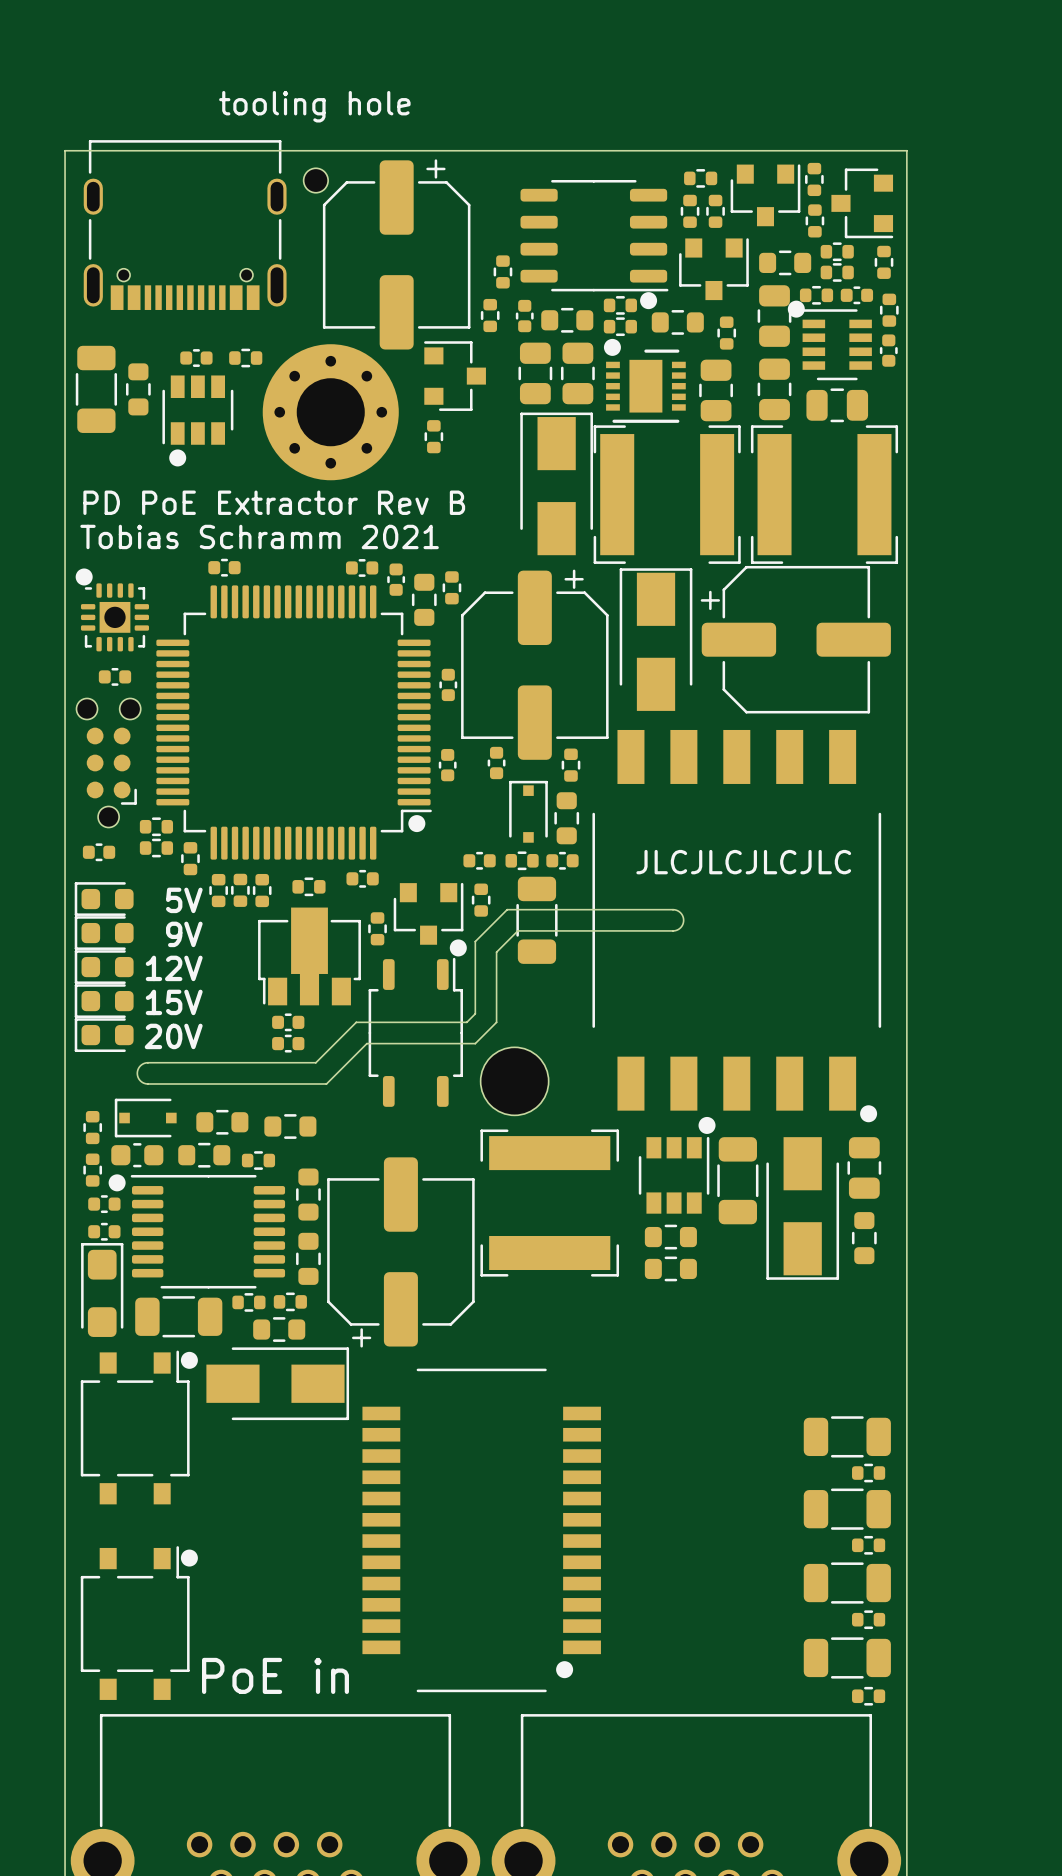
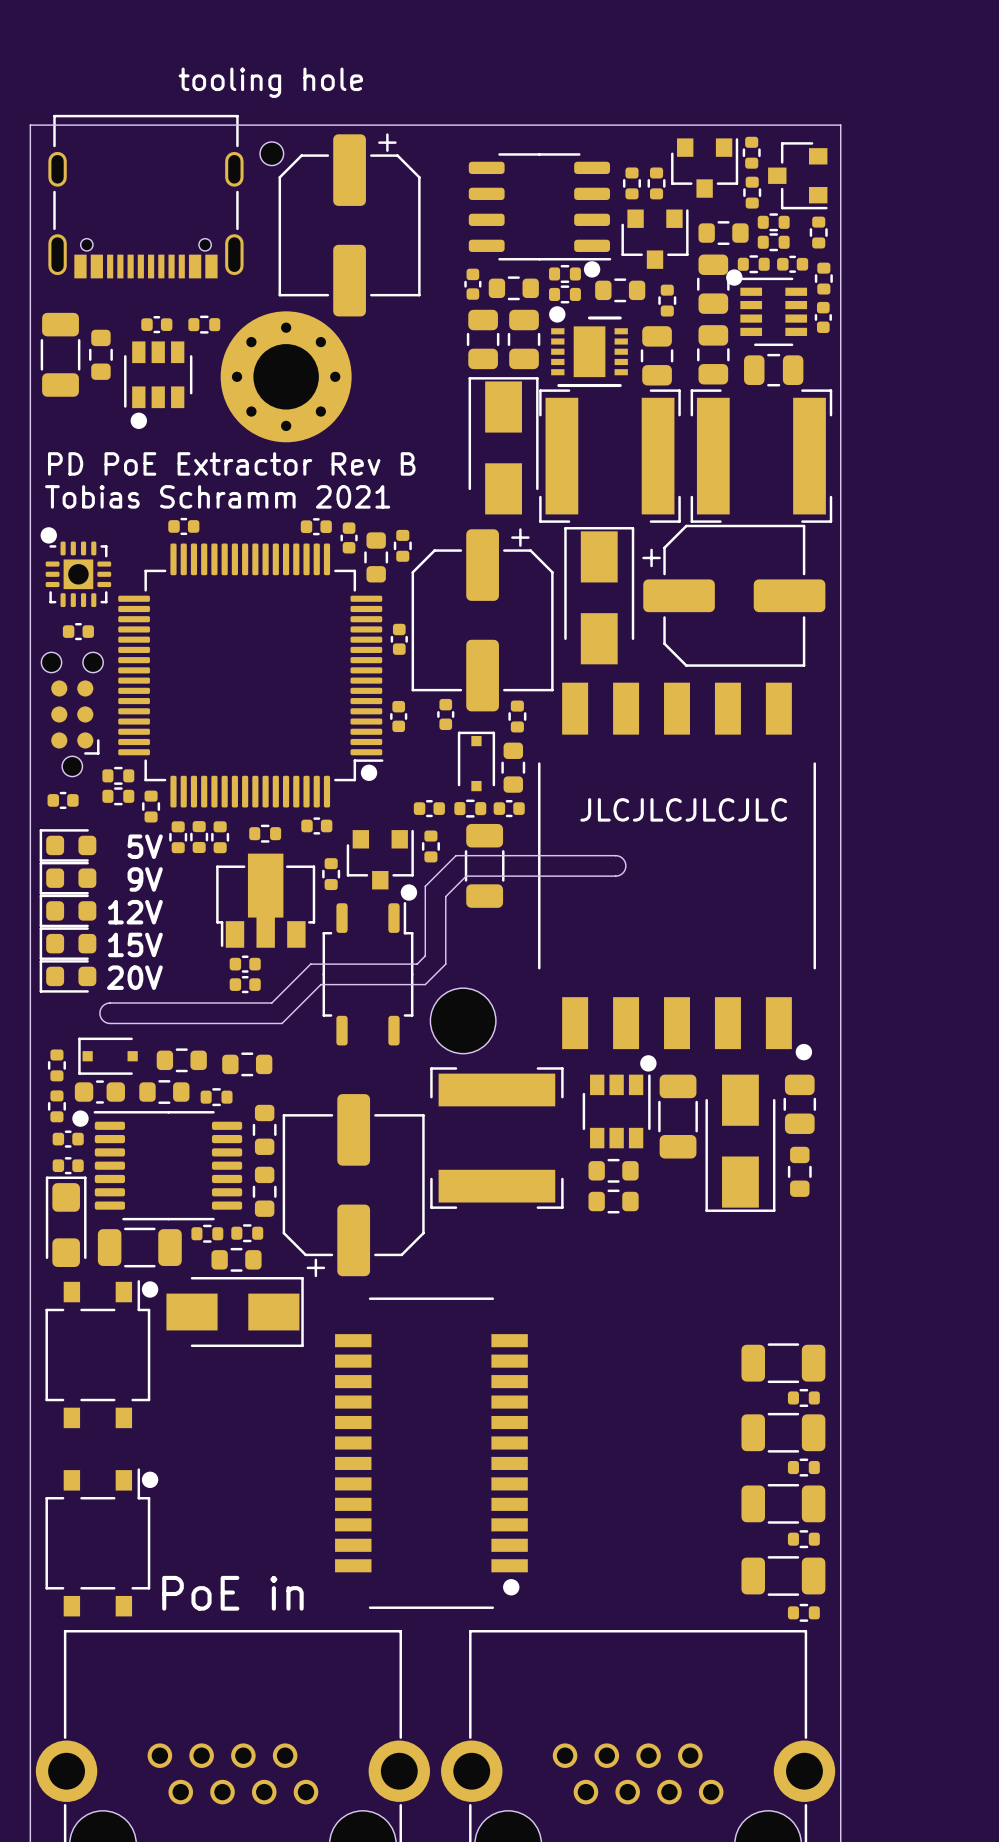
part: (700, 178) -> none
part: (502, 271) -> none
part: (490, 315) -> none
part: (455, 376) -> none
part: (433, 436) -> none
part footprint: [362, 1368, 601, 1693] -> [335, 1297, 528, 1609]

